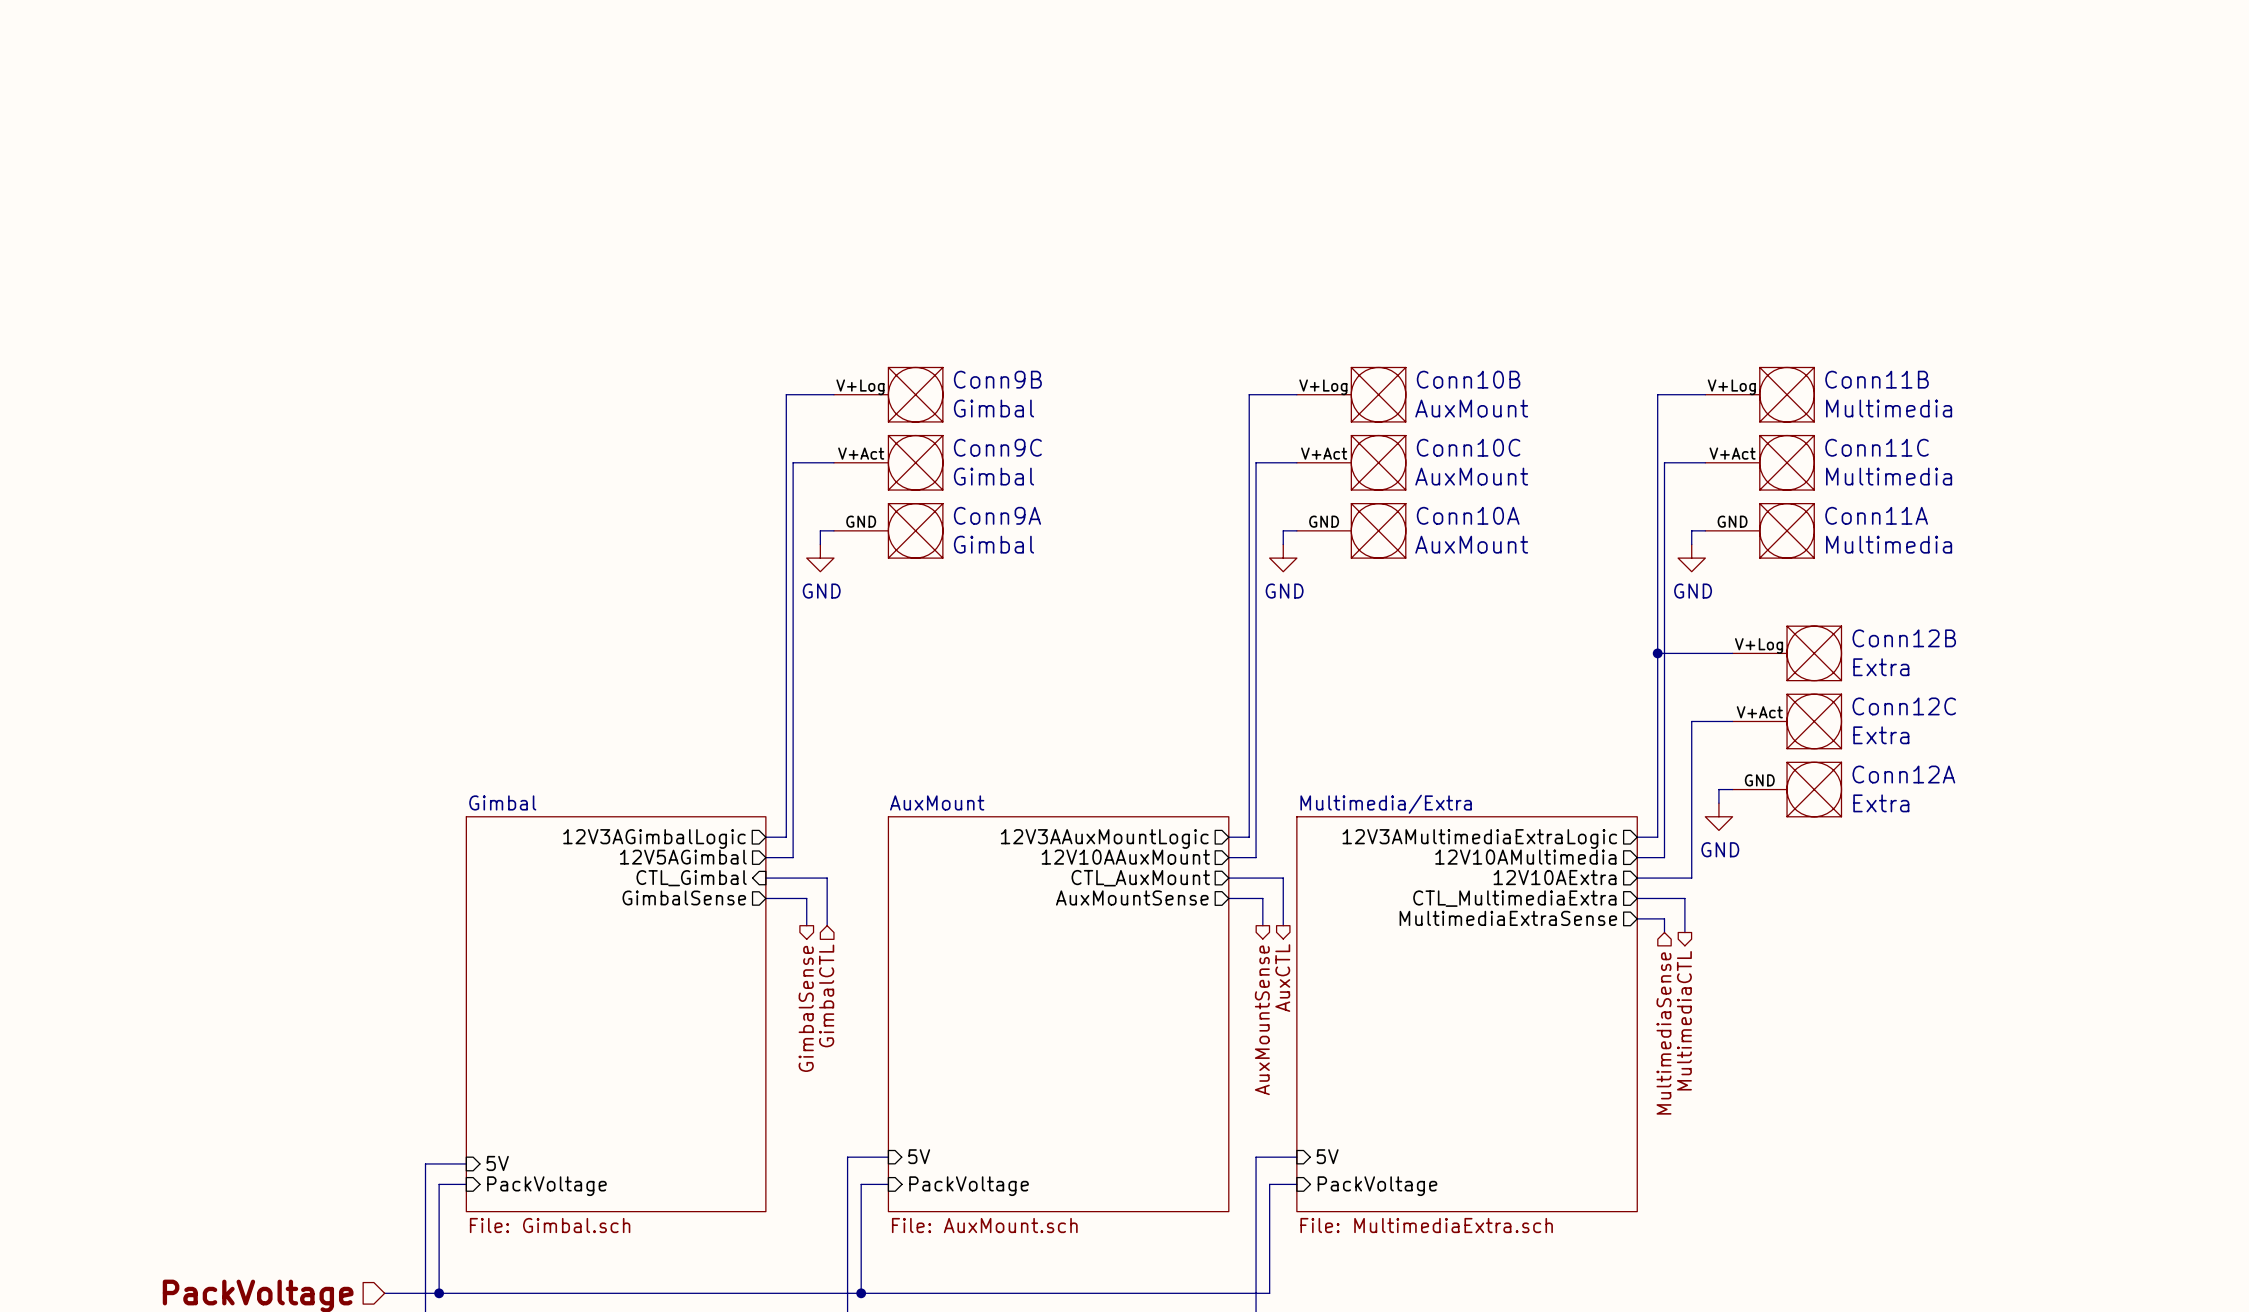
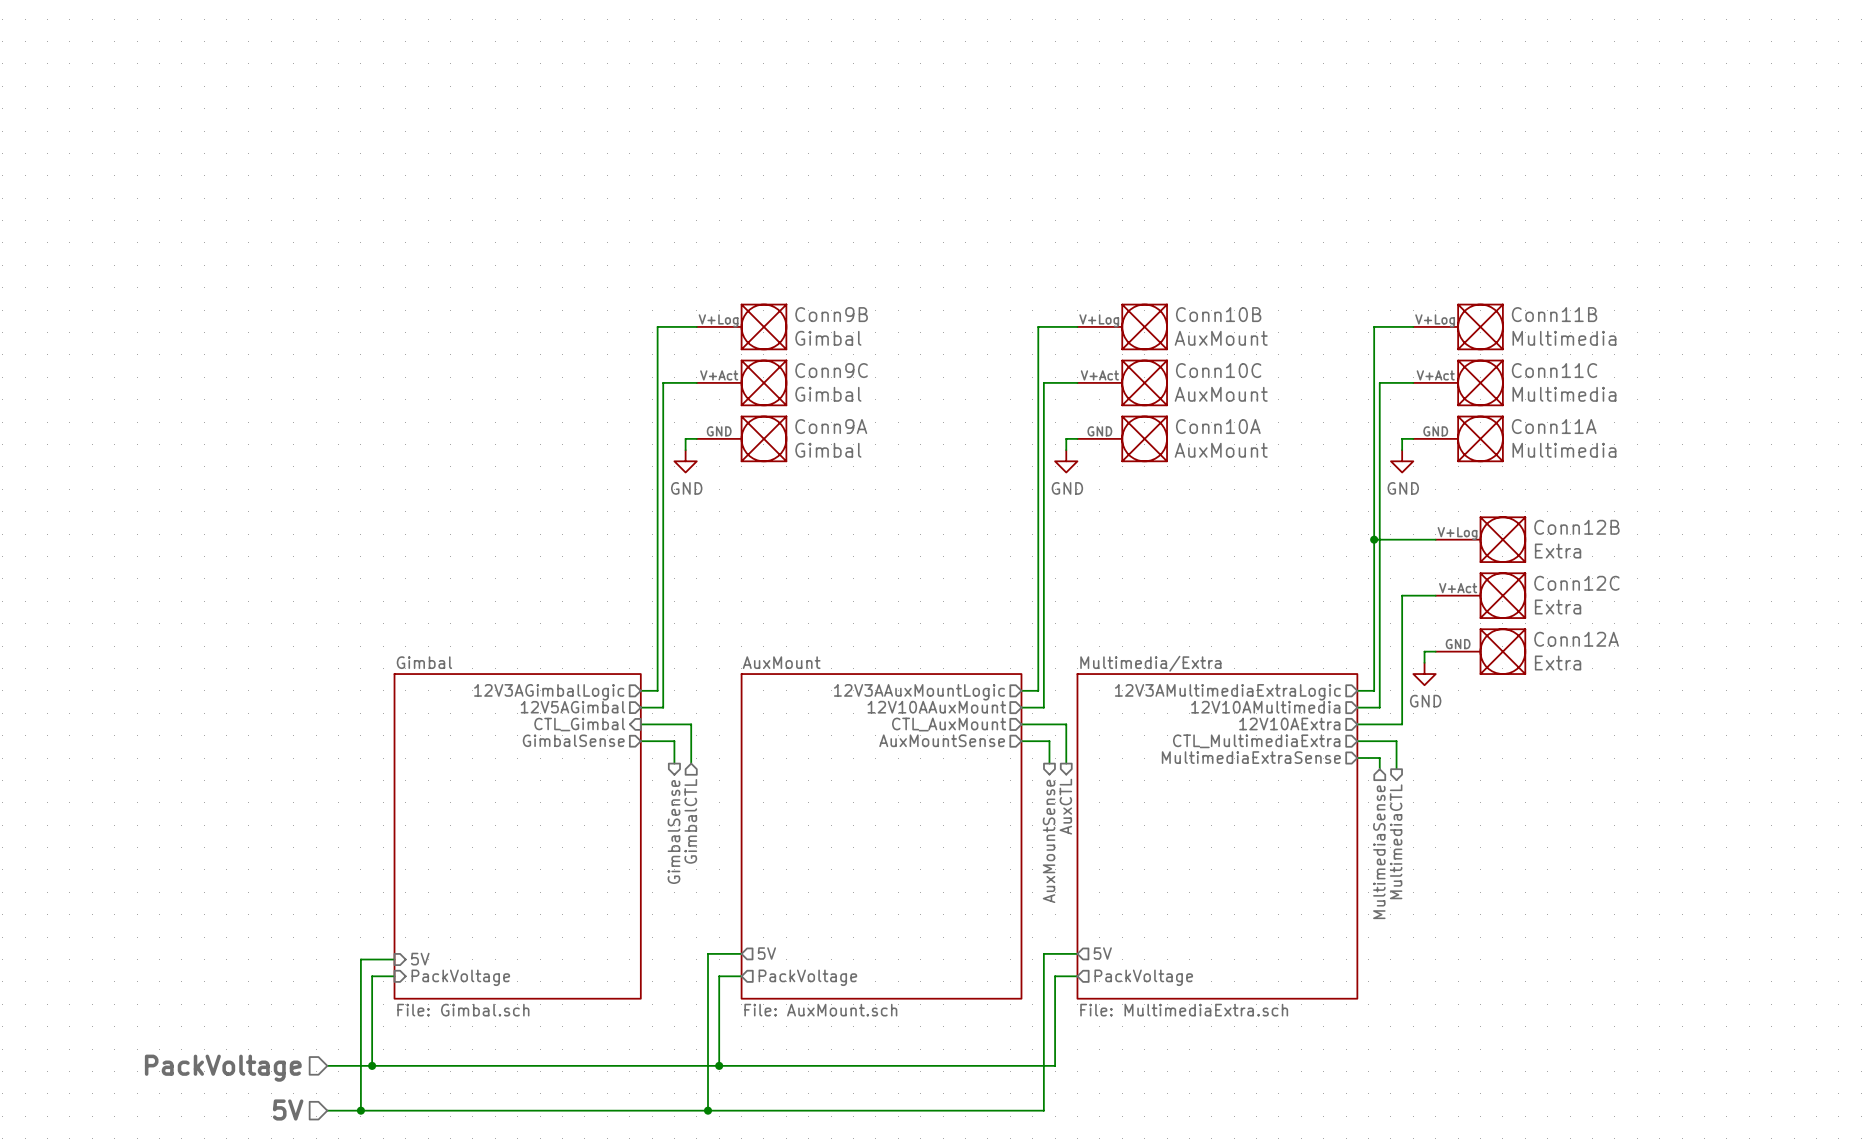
sheet pin shape: input (919, 1156) -> output (766, 953)
sheet pin shape: input (1327, 1156) -> output (1102, 953)
sheet pin: PackVoltage (969, 1186) -> none
hierarchical label: none -> PackVoltage (807, 977)
sheet pin: PackVoltage (1377, 1186) -> none
hierarchical label: none -> PackVoltage (1143, 977)

